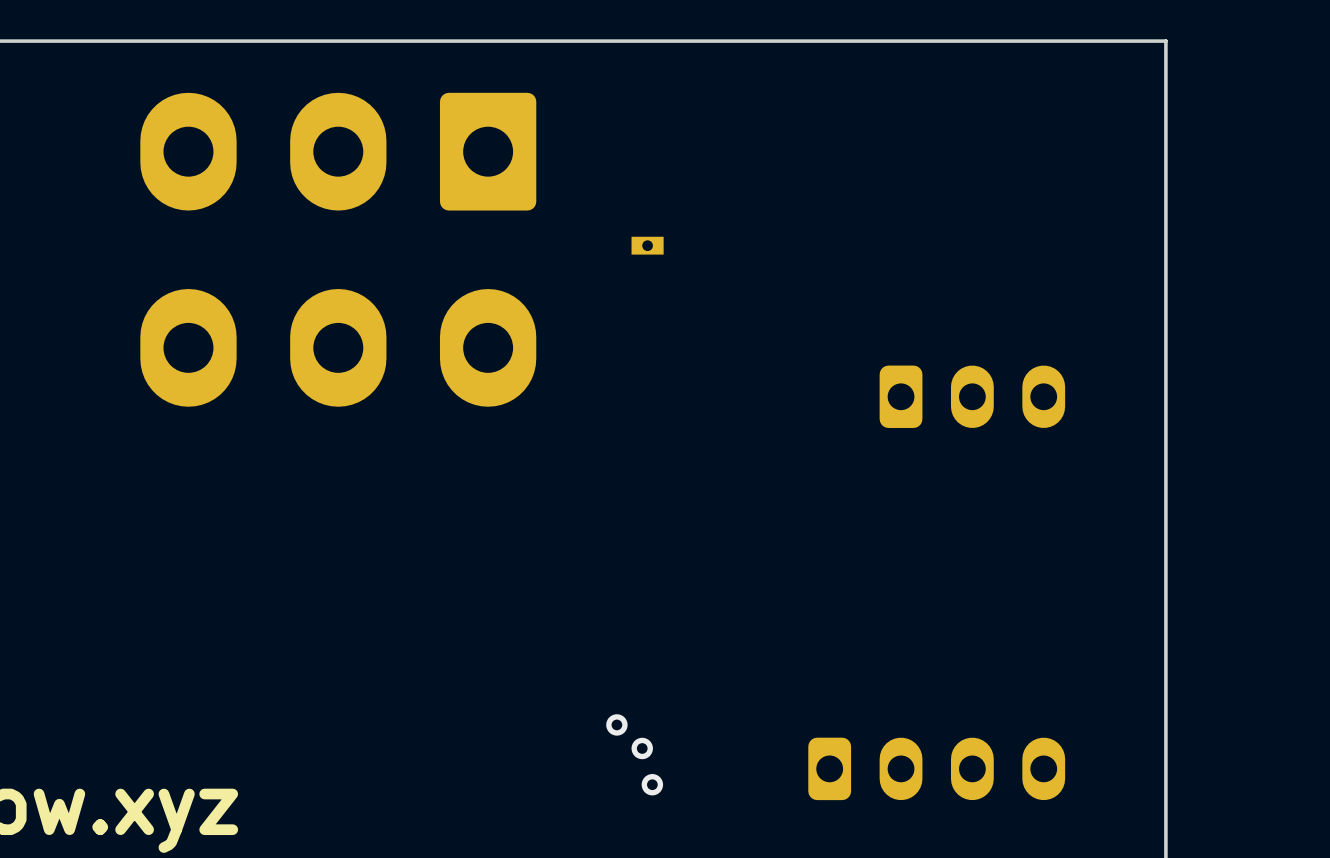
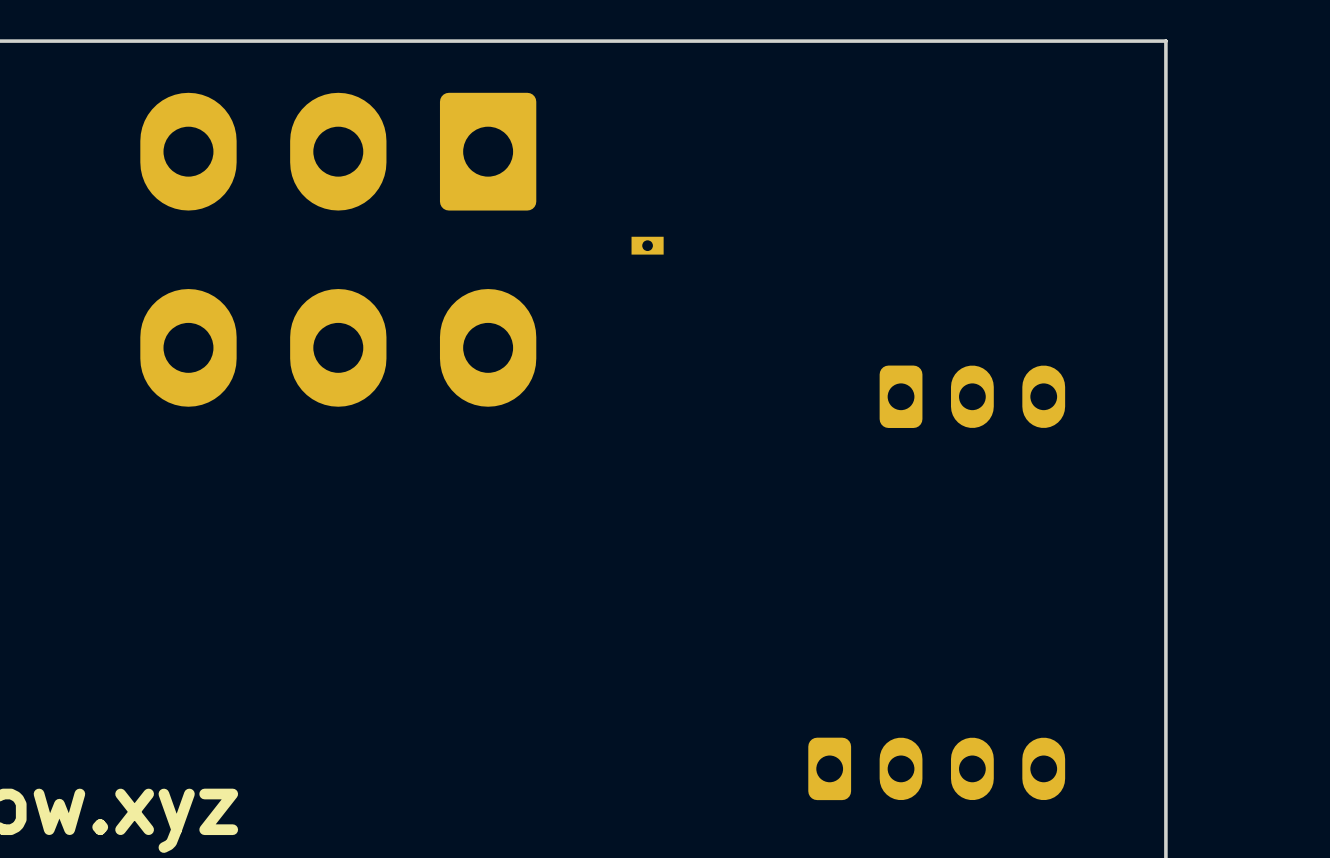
via: (616, 724) -> none
via: (642, 748) -> none
via: (652, 784) -> none

